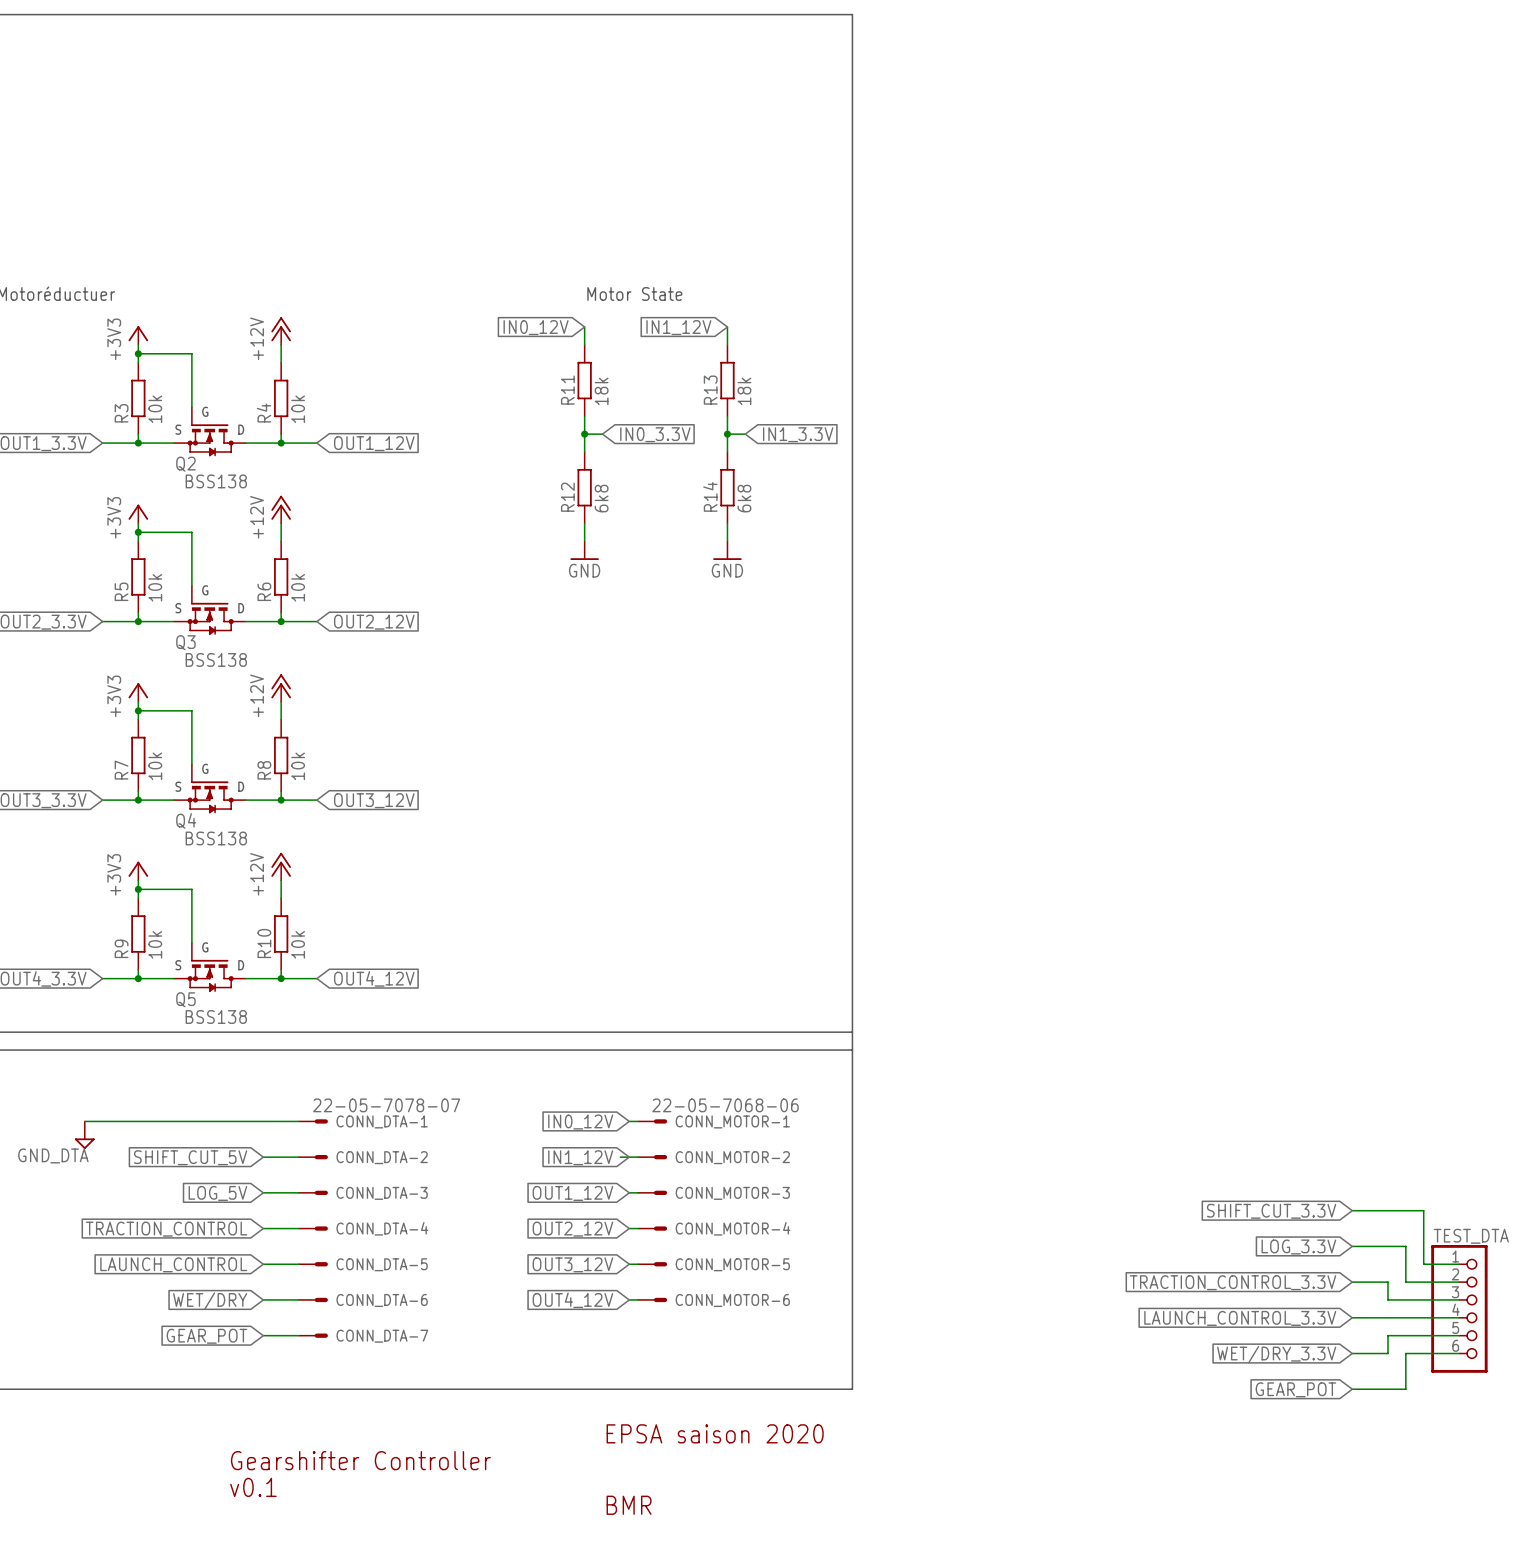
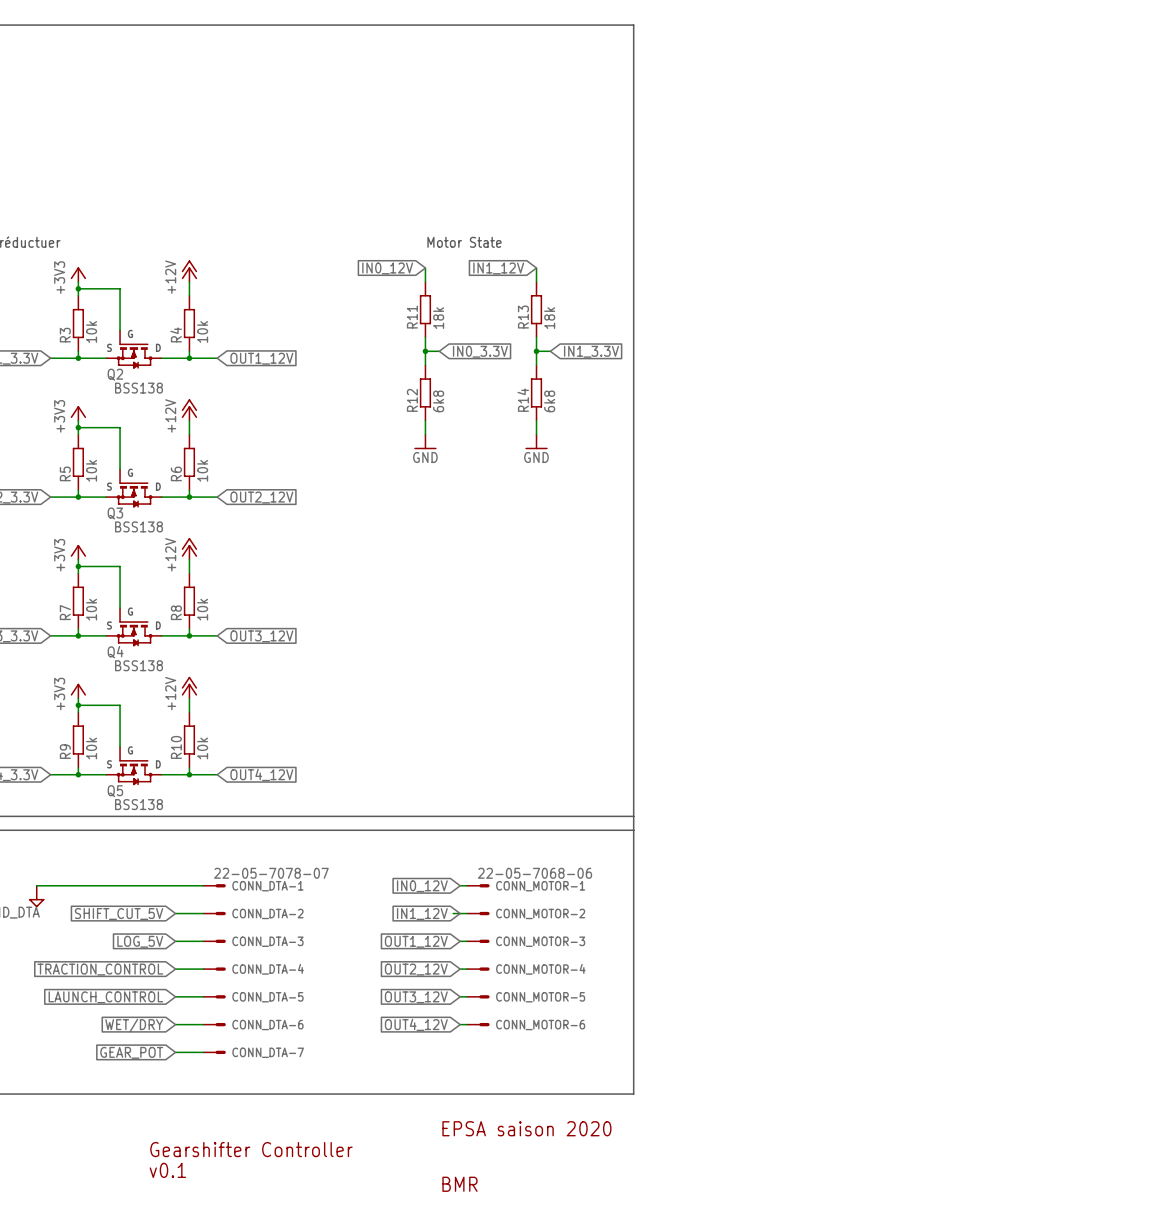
wire: (1352, 1210) (1423, 1210) (1423, 1264) (1459, 1264) -> none
global label: SHIFT_CUT_3.3V (1271, 1211) -> none
wire: (1352, 1246) (1405, 1246) (1405, 1282) (1459, 1282) -> none
global label: LOG_3.3V (1298, 1247) -> none
global label: TRACTION_CONTROL_3.3V (1233, 1282) -> none
wire: (1352, 1282) (1388, 1282) (1388, 1299) (1459, 1299) -> none
TEST_DTA: (1459, 1308) -> none
wire: (1352, 1317) (1459, 1317) -> none
global label: LAUNCH_CONTROL_3.3V (1240, 1318) -> none
wire: (1459, 1335) (1388, 1335) (1388, 1353) (1352, 1353) -> none
wire: (1459, 1353) (1405, 1353) (1405, 1389) (1352, 1389) -> none
global label: WET/DRY_3.3V (1276, 1354) -> none
global label: GEAR_POT (1295, 1389) -> none

